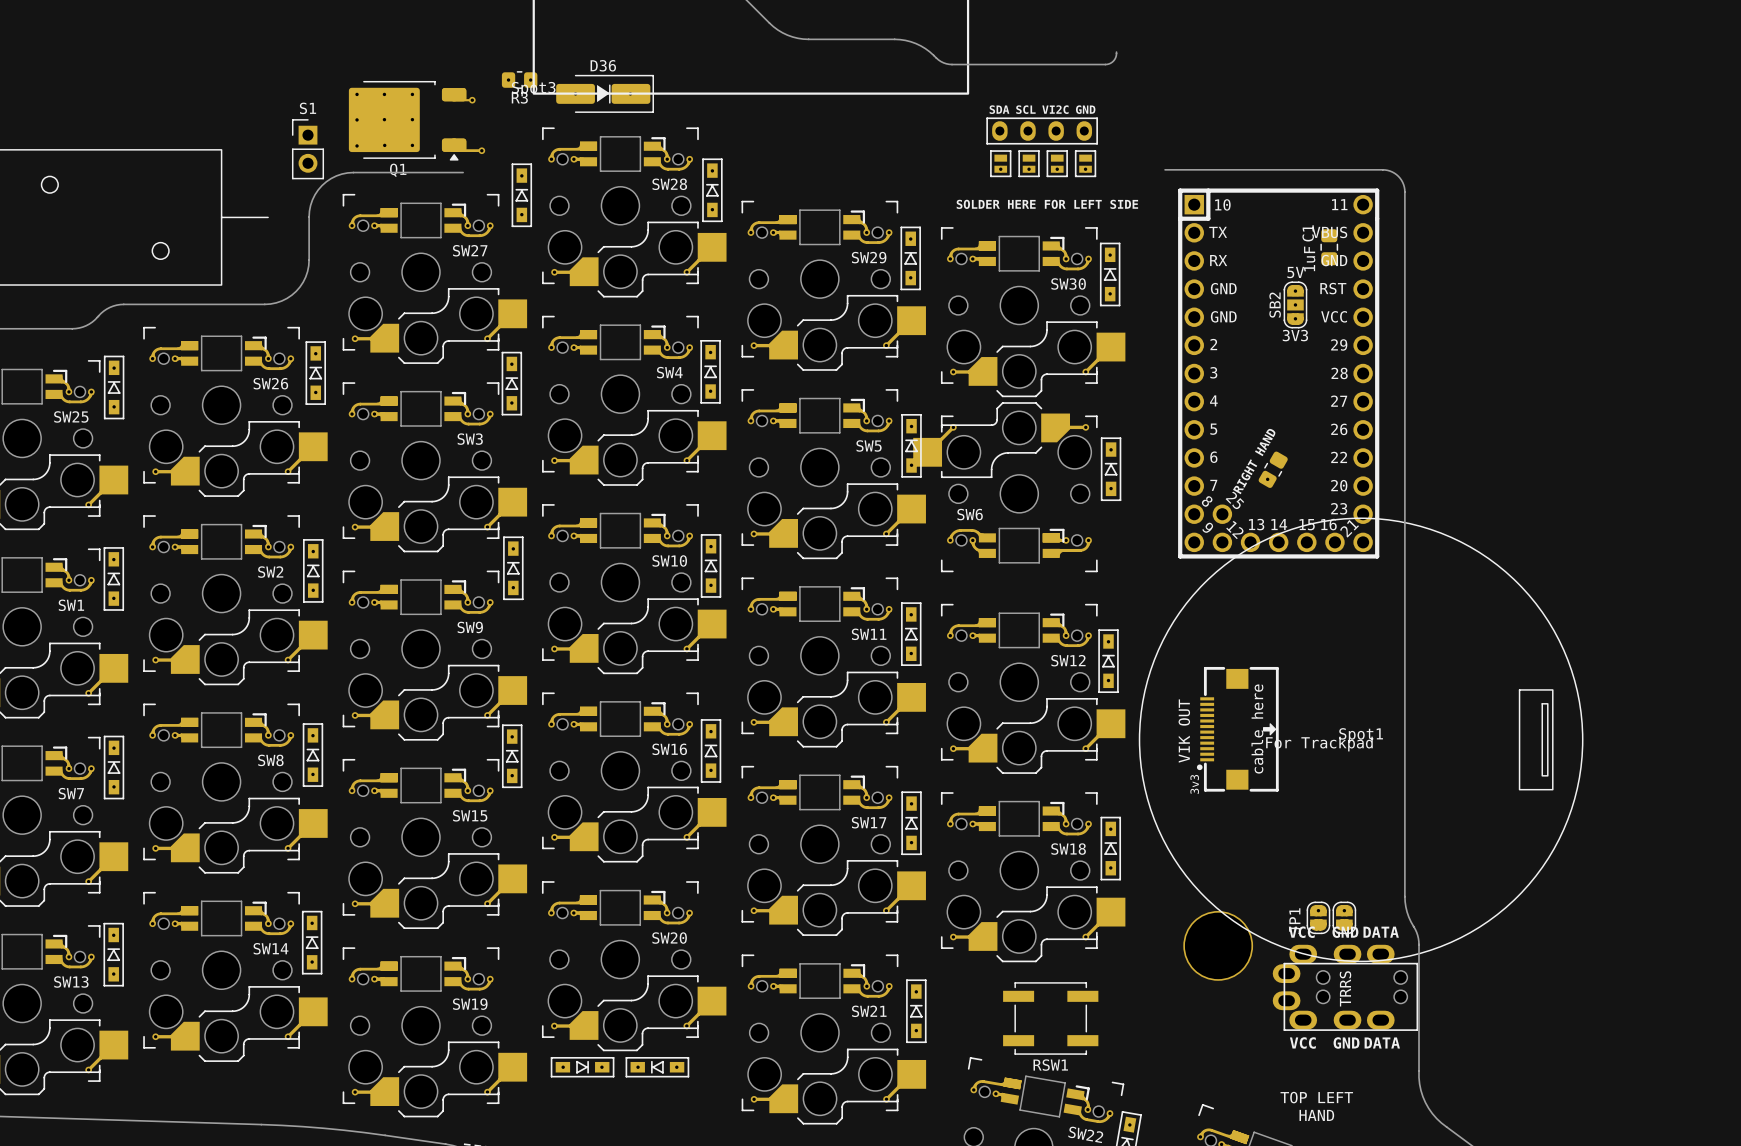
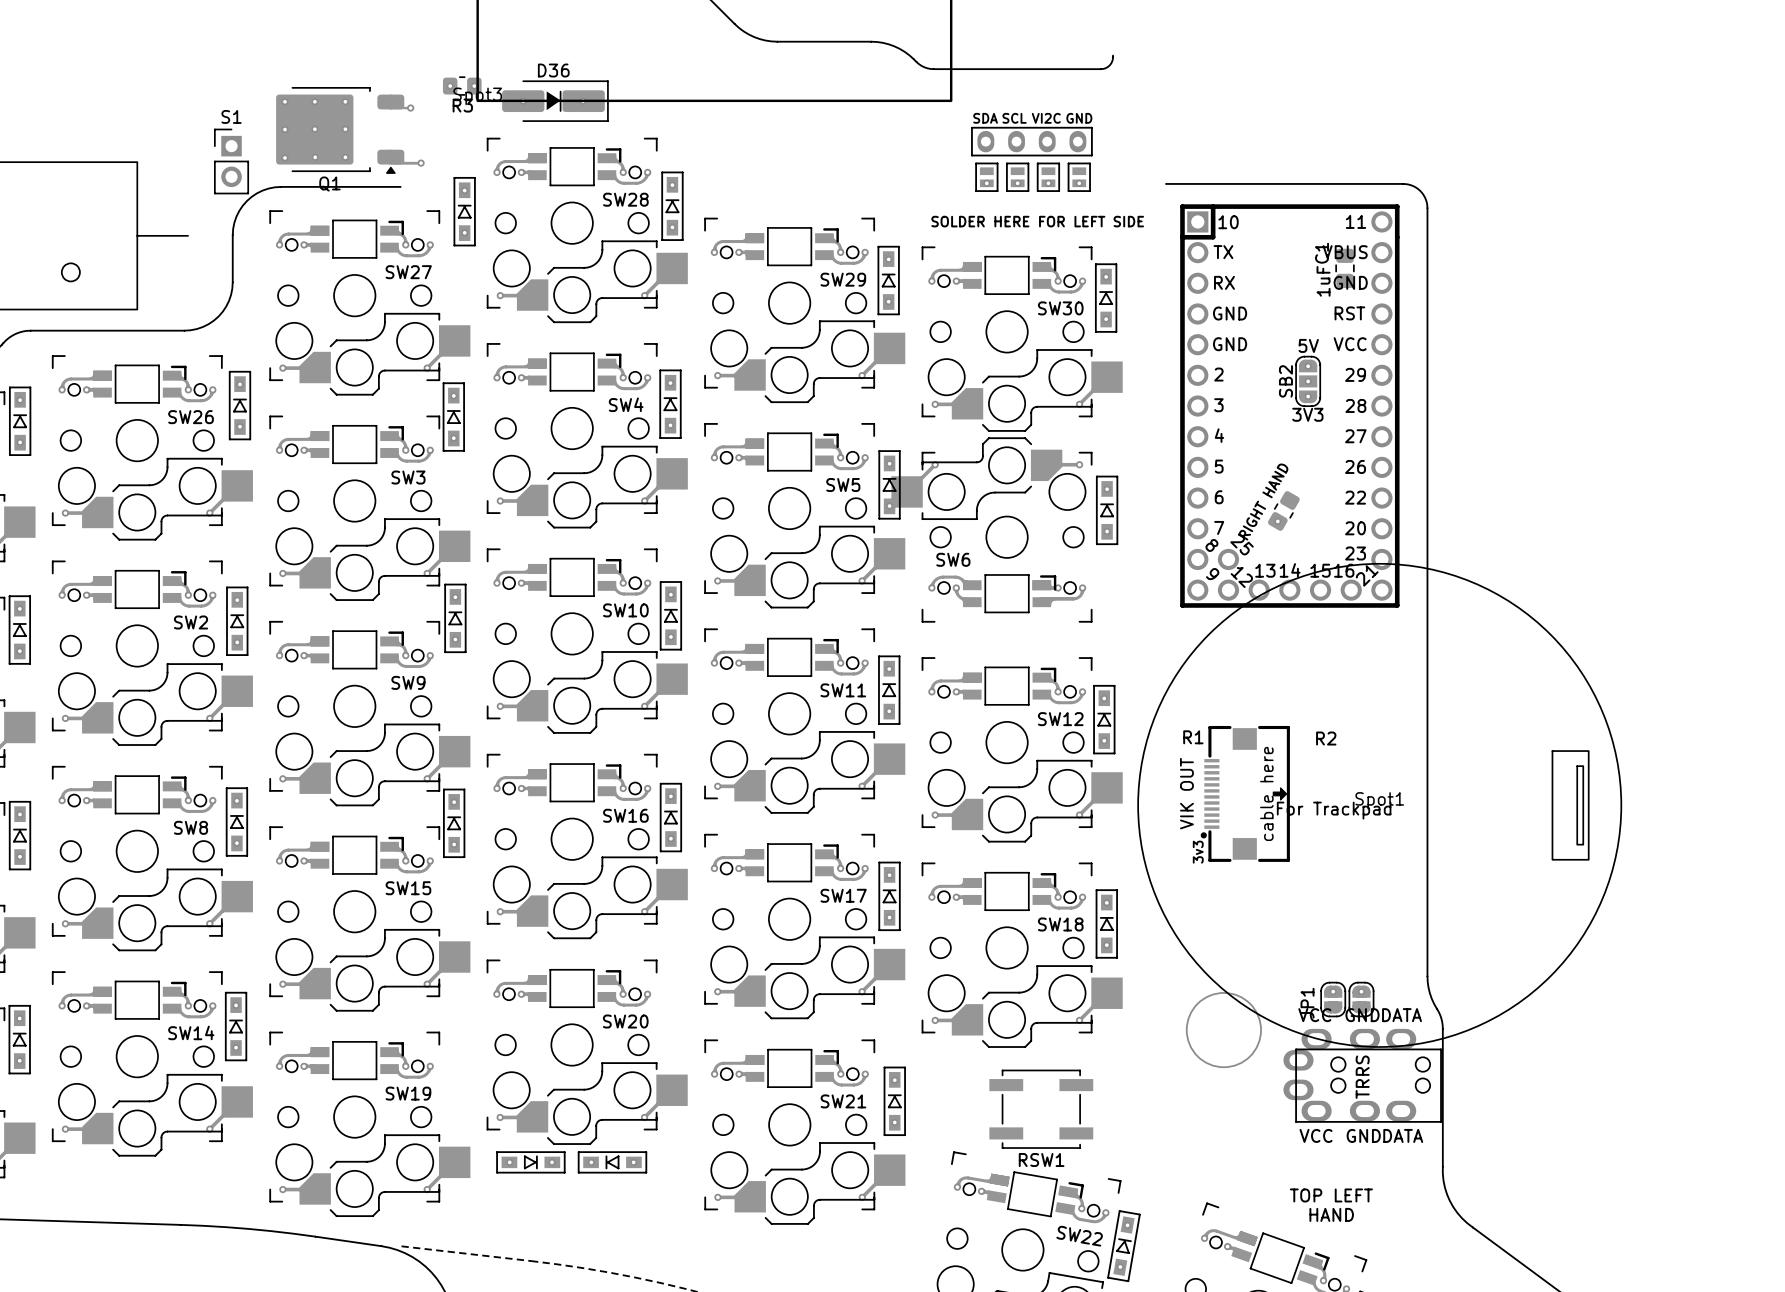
SB2 position: (1295, 304) -> (1308, 381)
text: none -> R1 (1193, 737)
text: none -> R2 (1326, 738)

